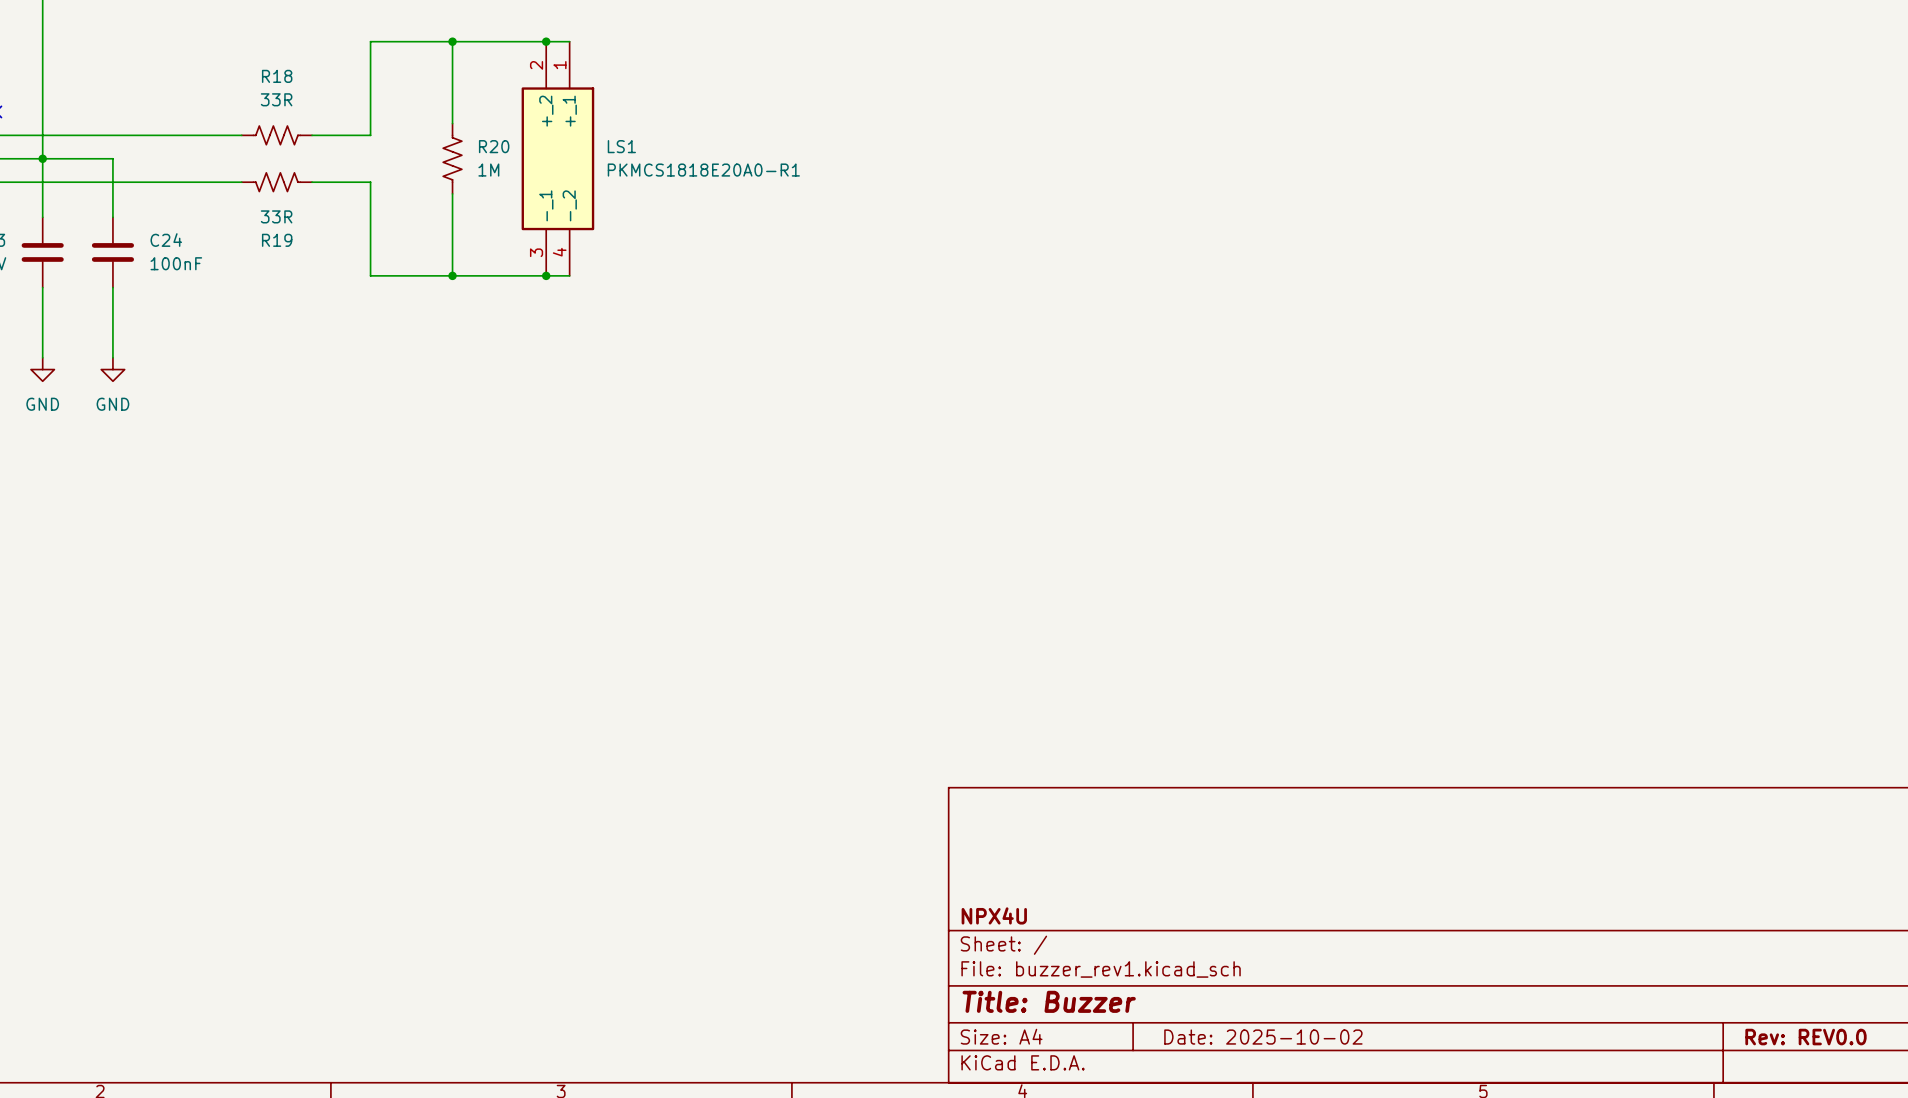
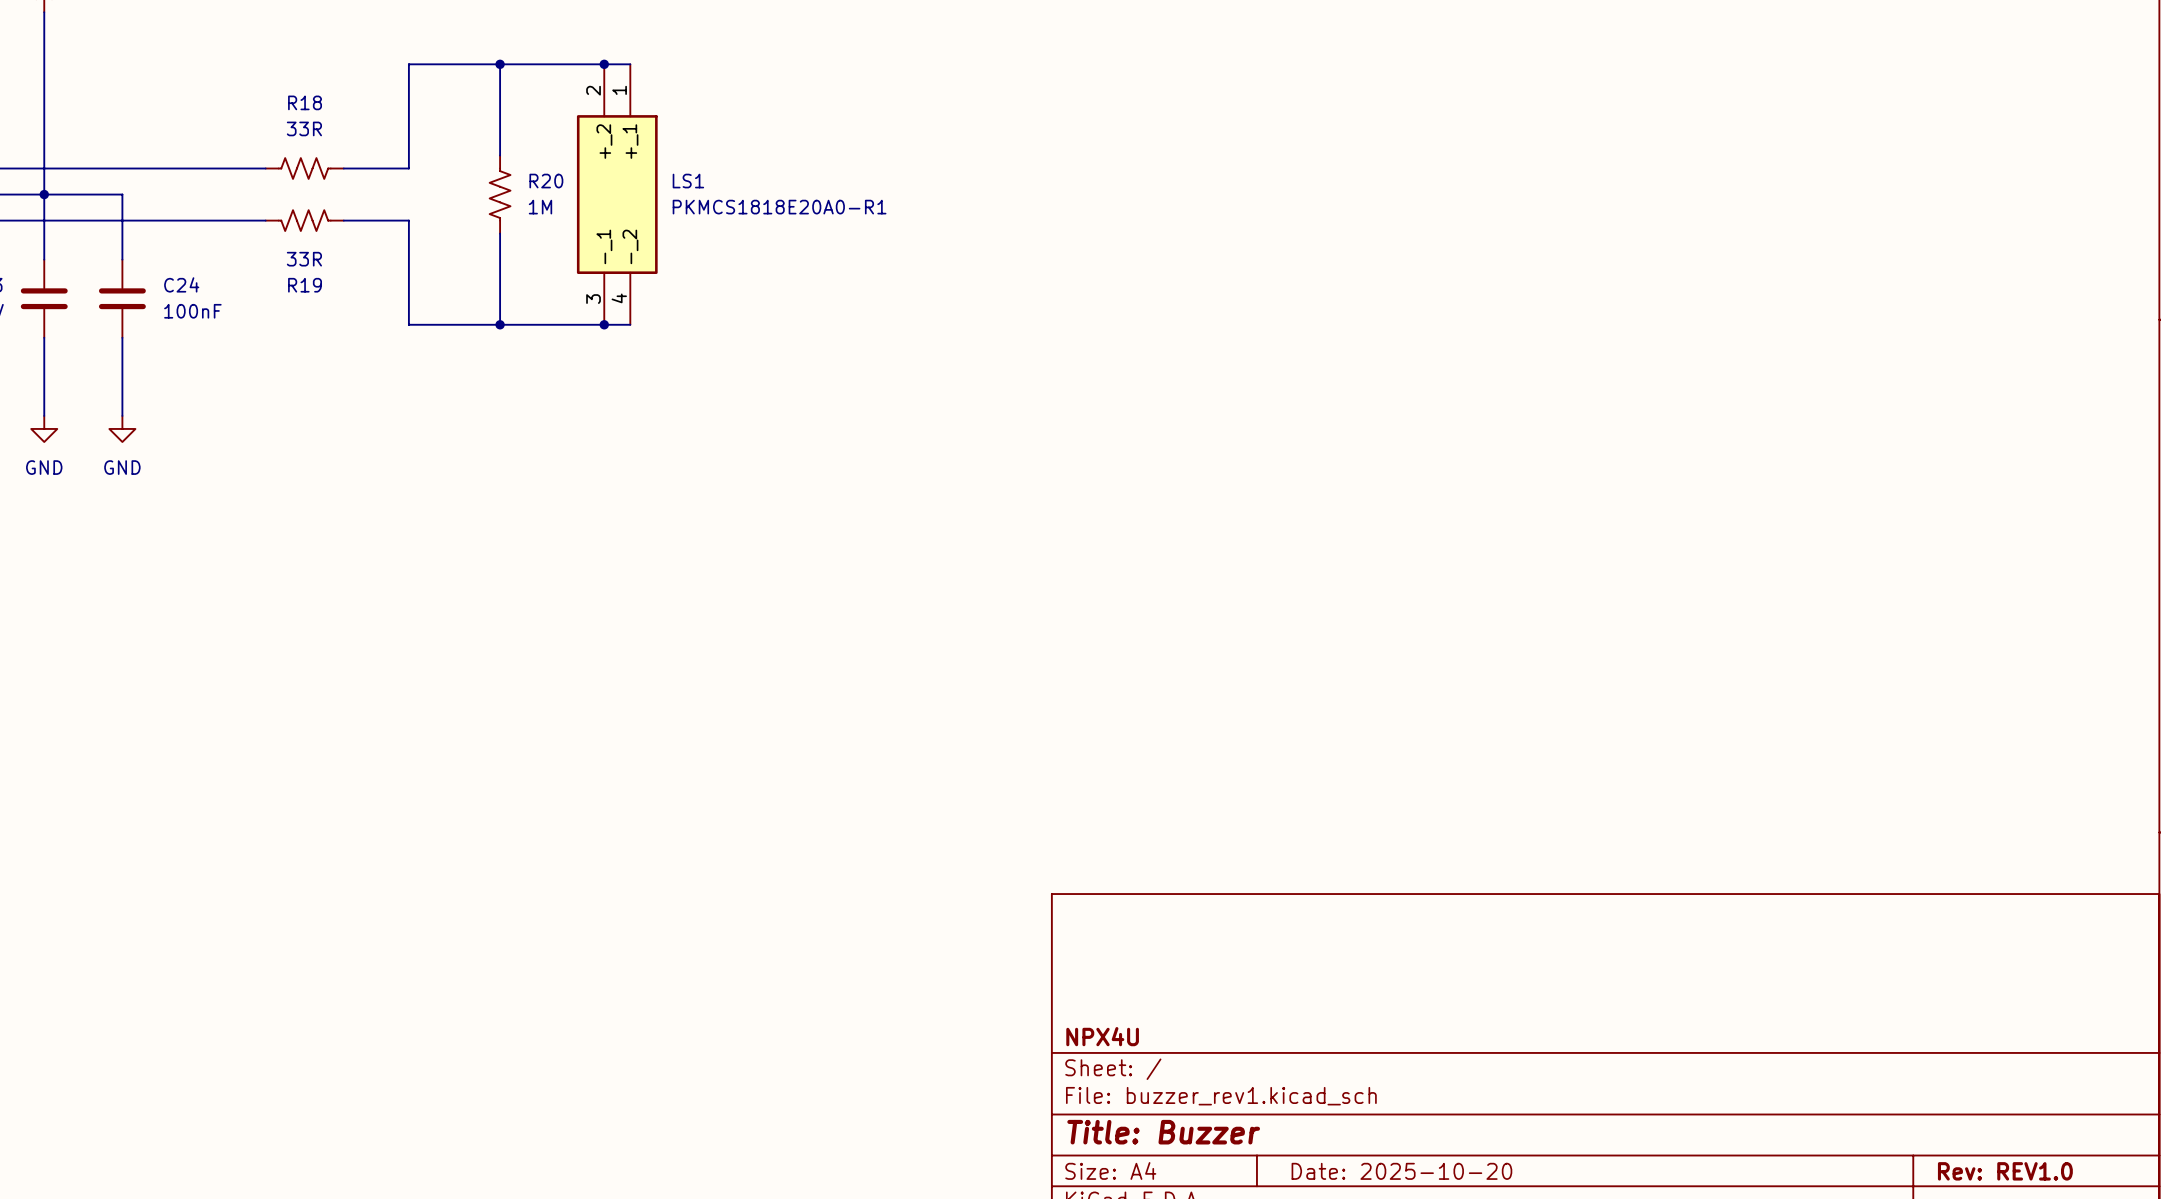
title block: Date: 2025-10-02 (1263, 1037) -> Date: 2025-10-20 (1401, 1171)
title block: Rev: REV0.0 (1805, 1037) -> Rev: REV1.0 (2005, 1171)

